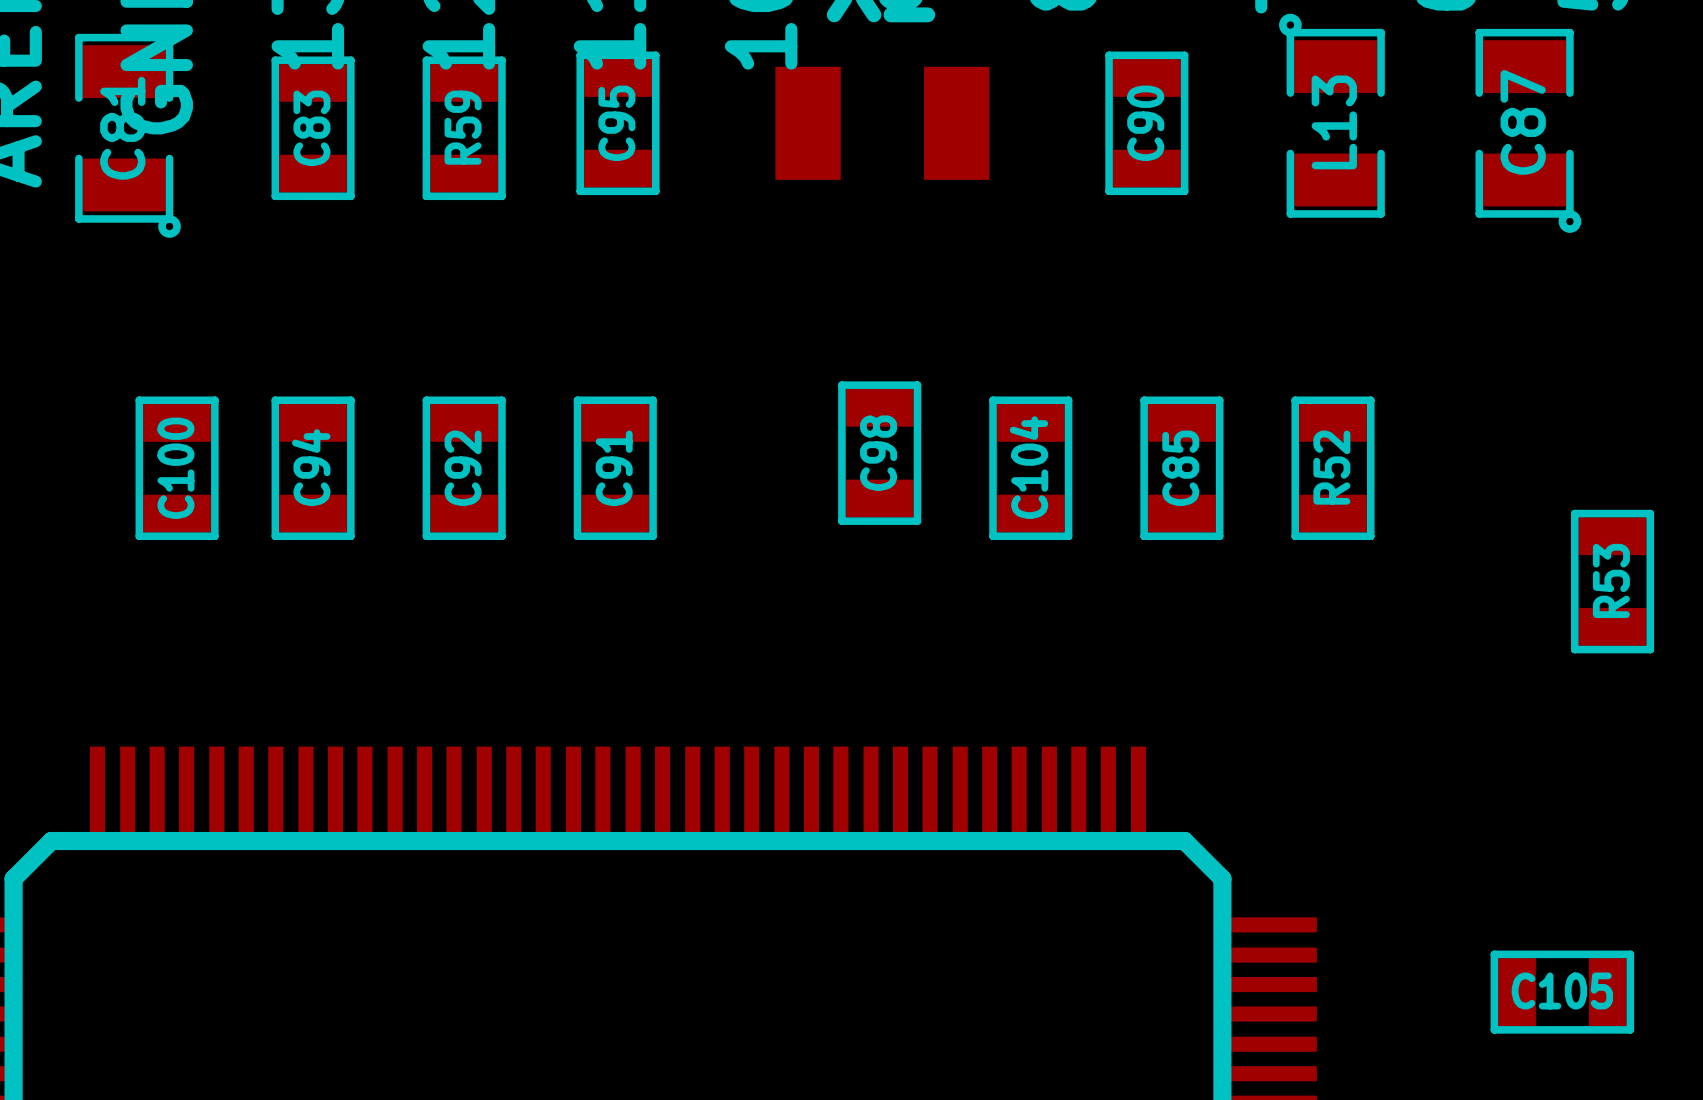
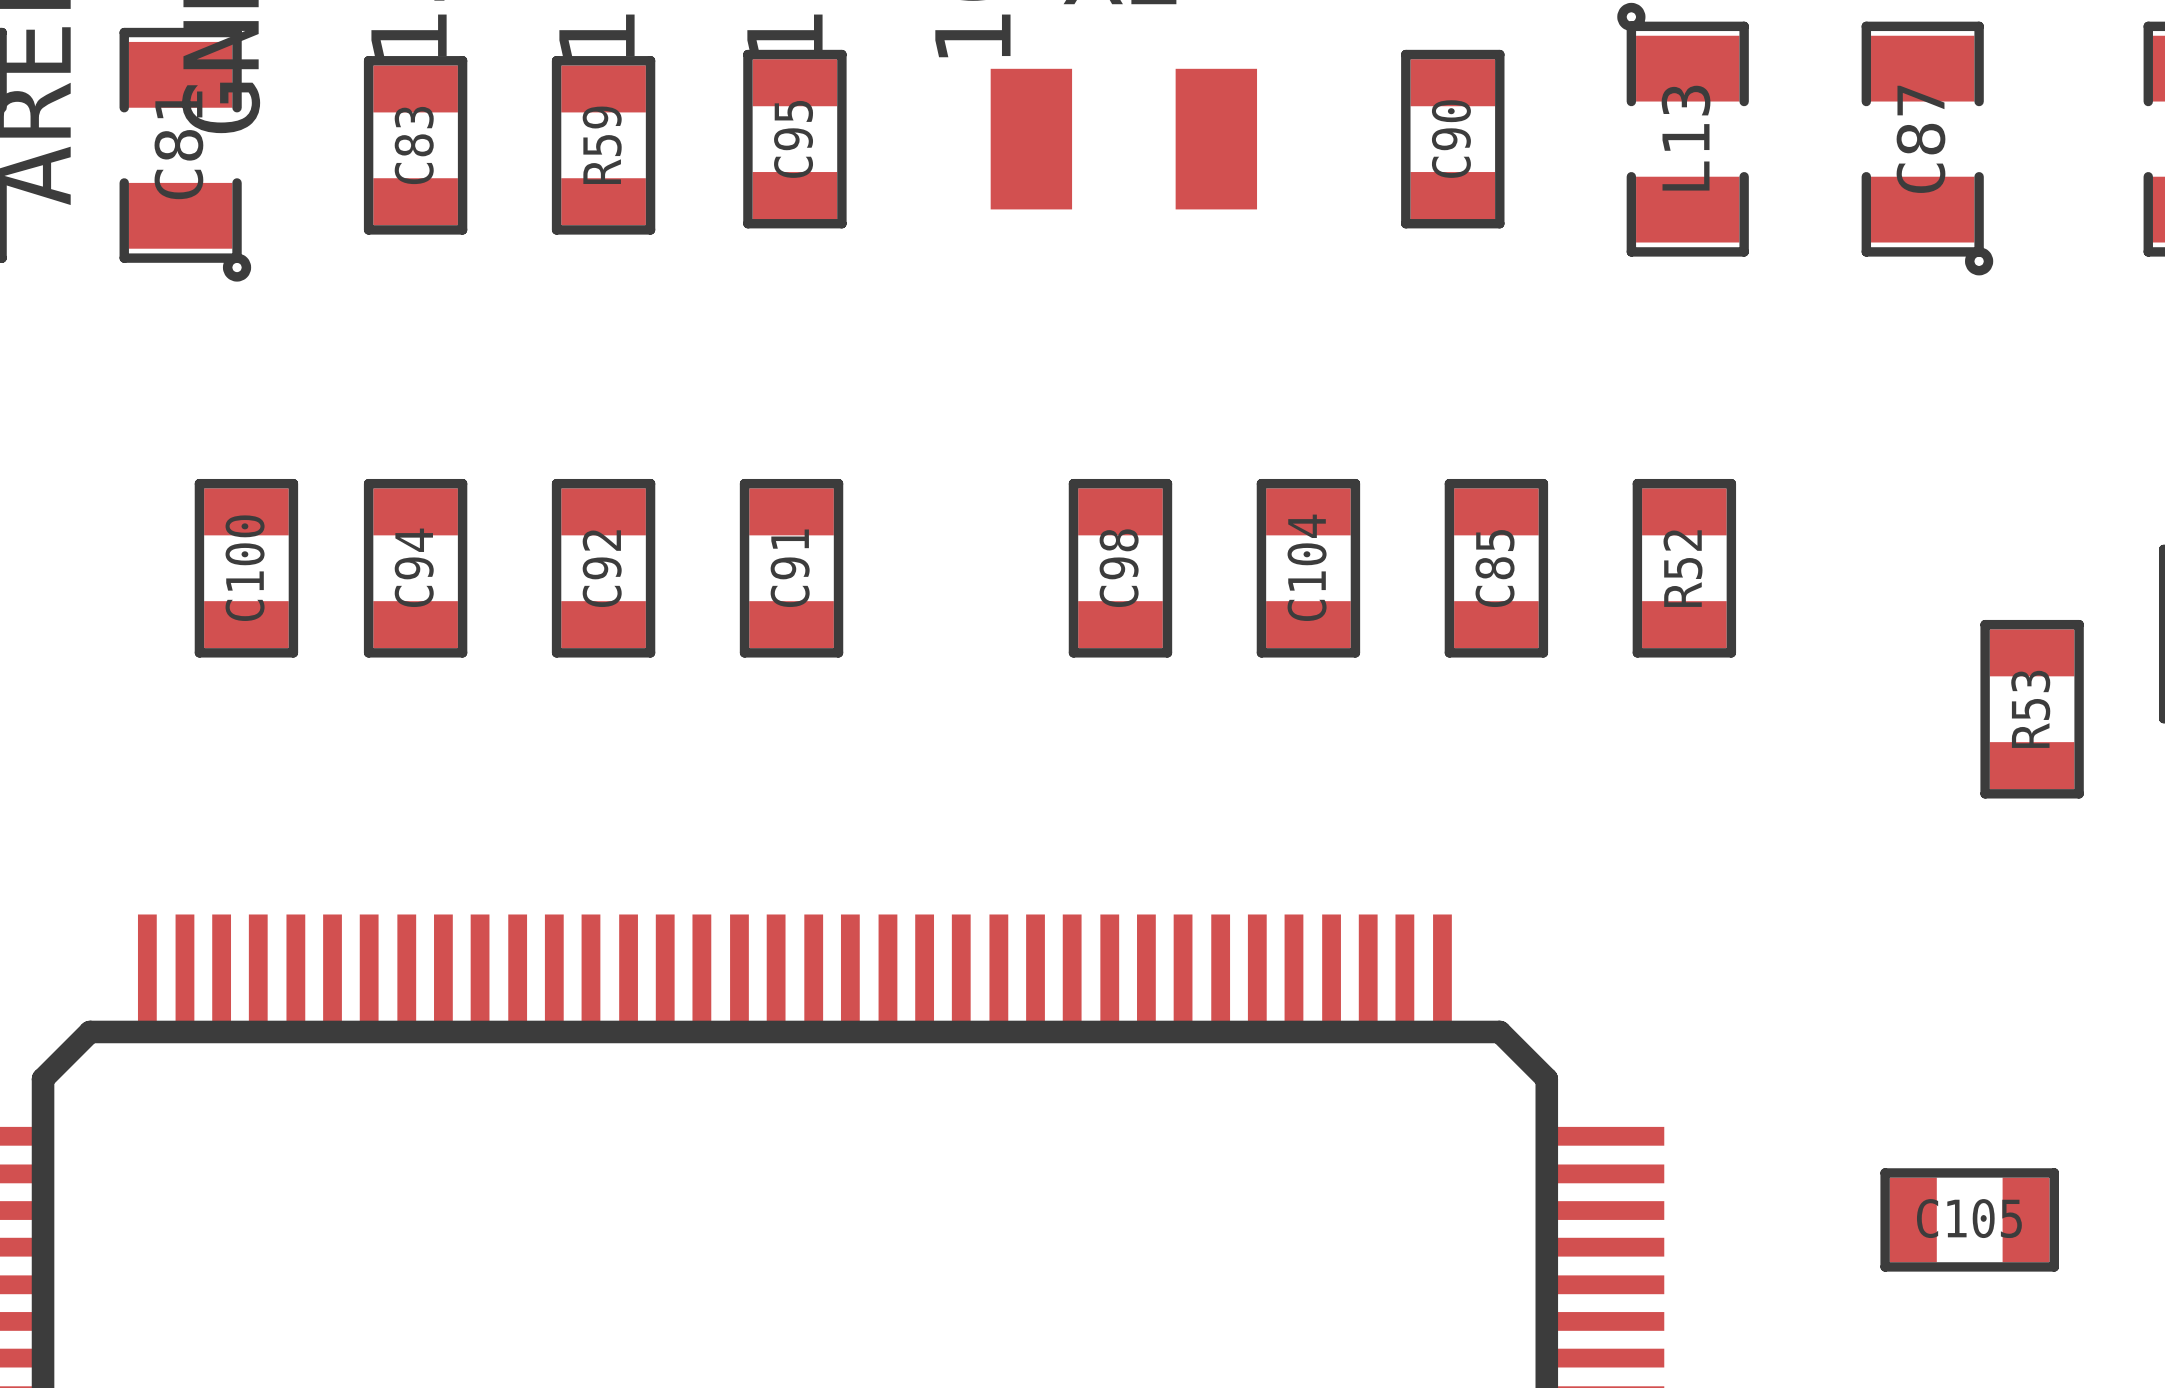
C98 position: (879, 453) -> (1120, 568)

